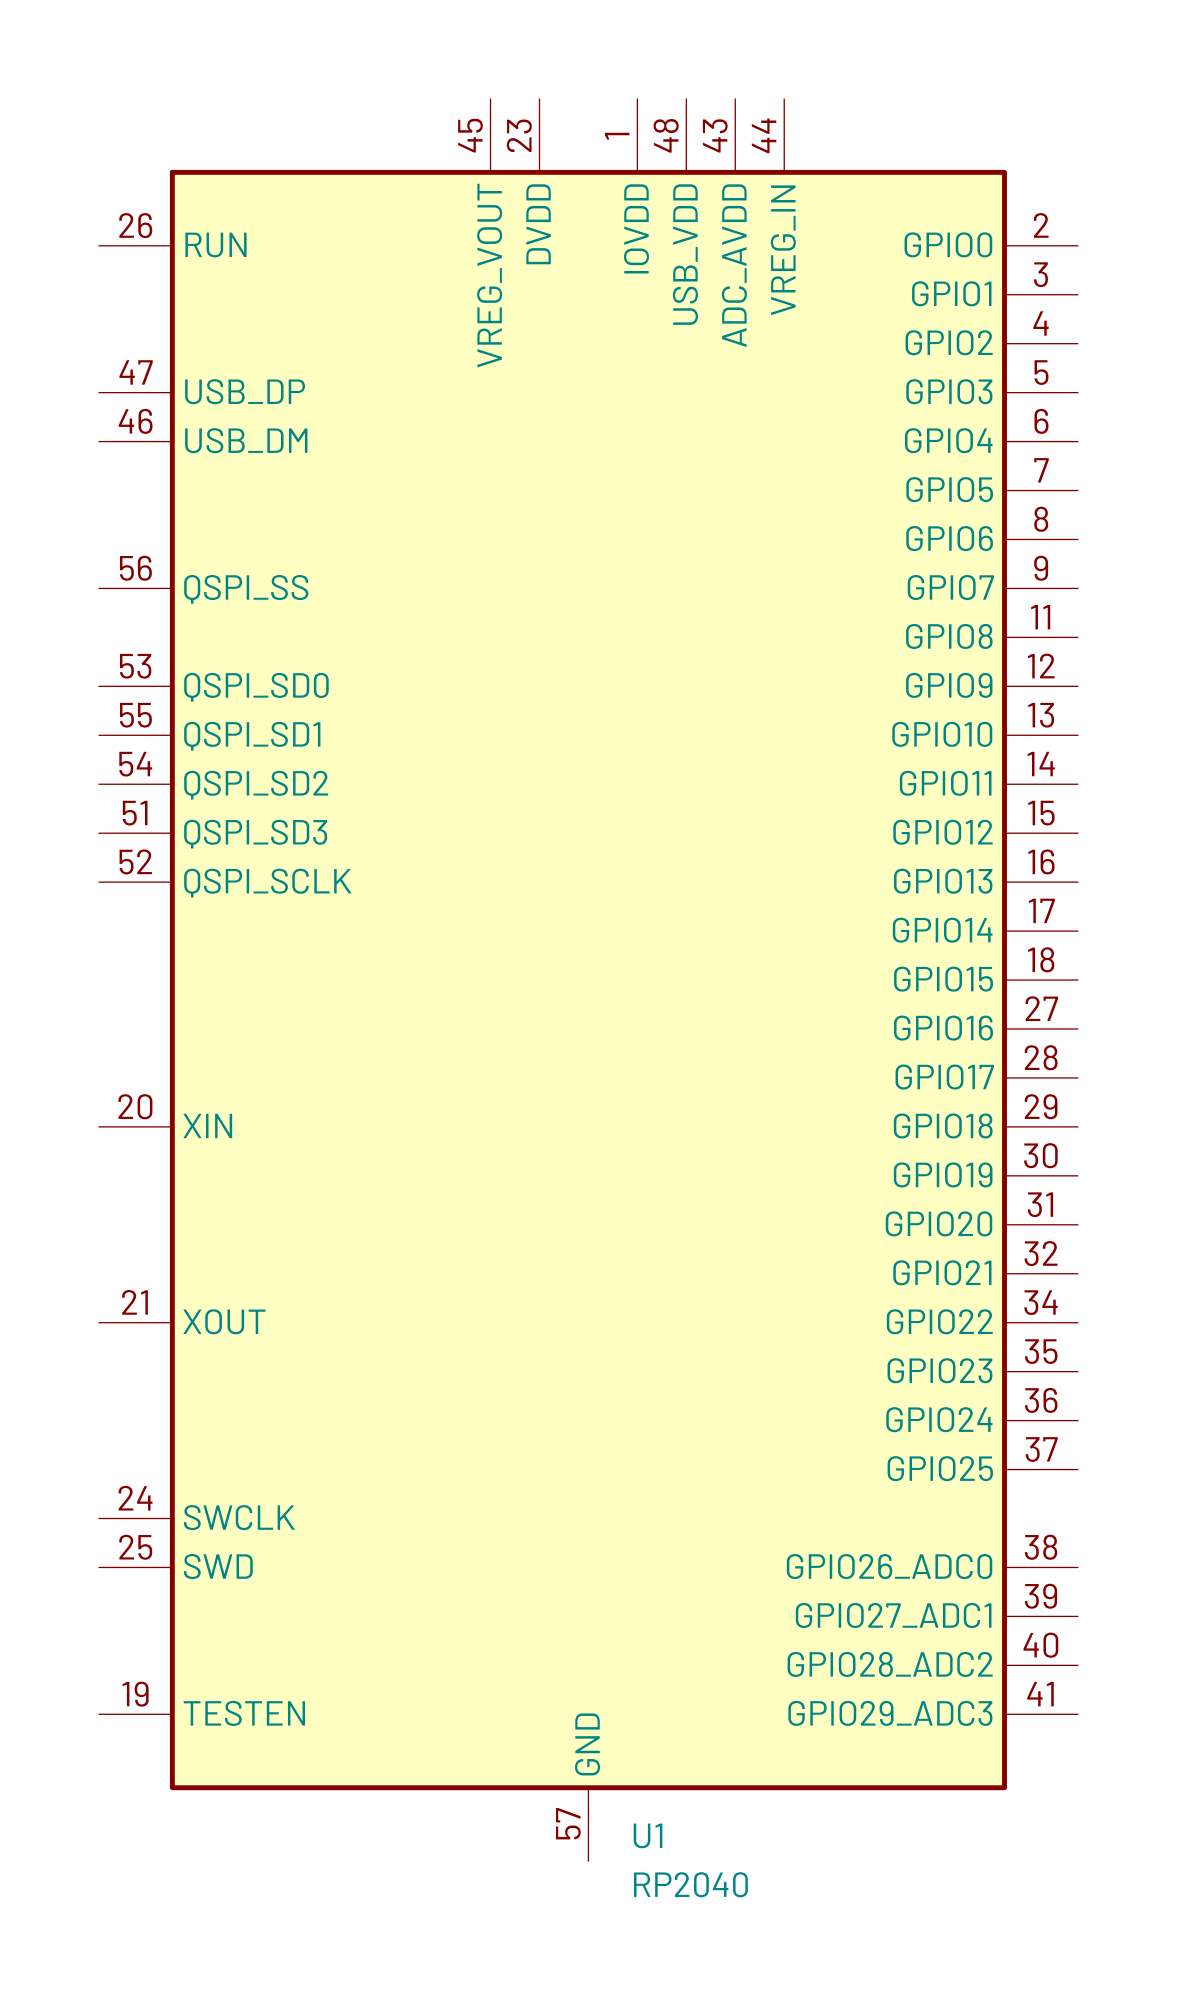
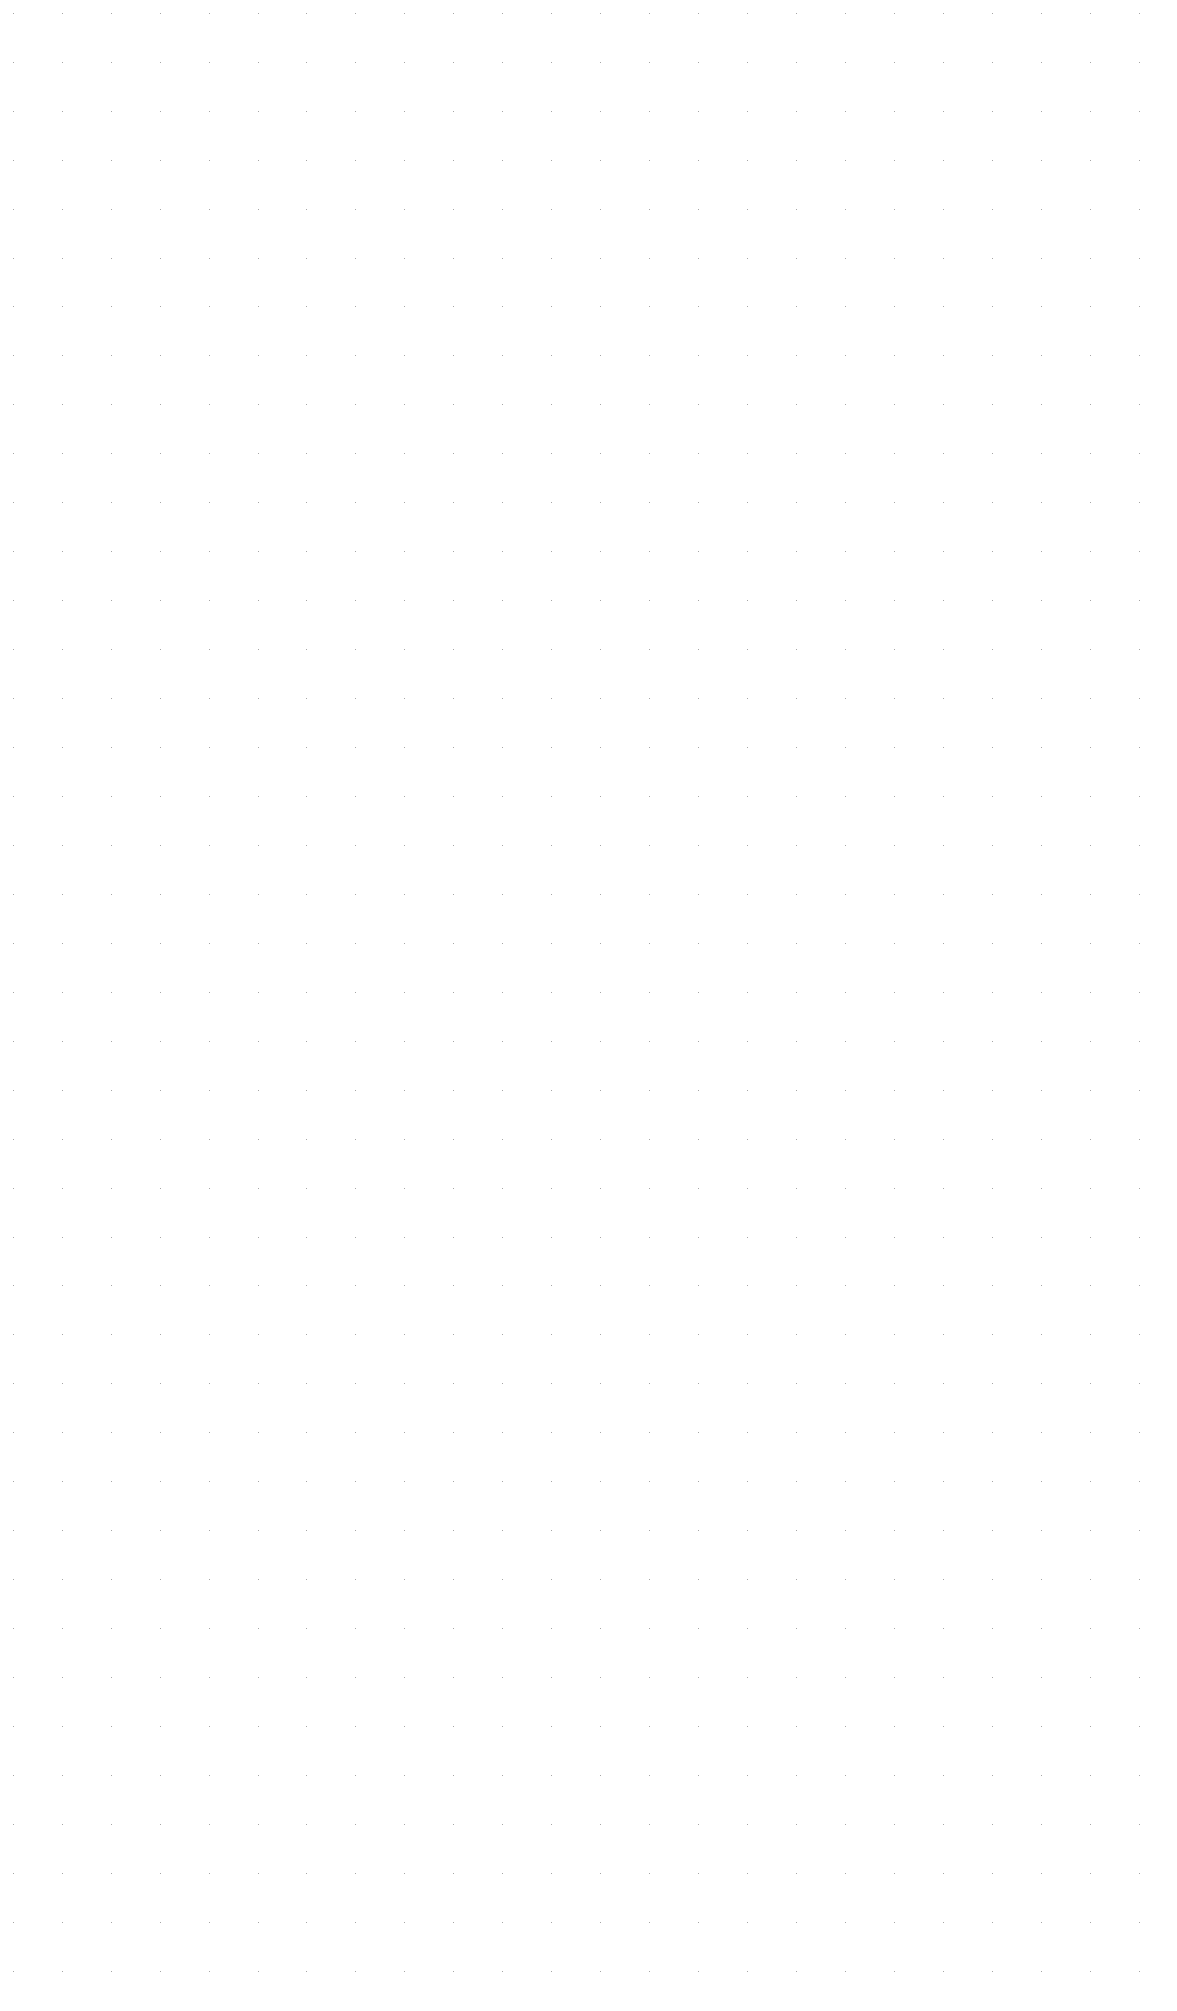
U1: RP2040 (588, 980) -> none

